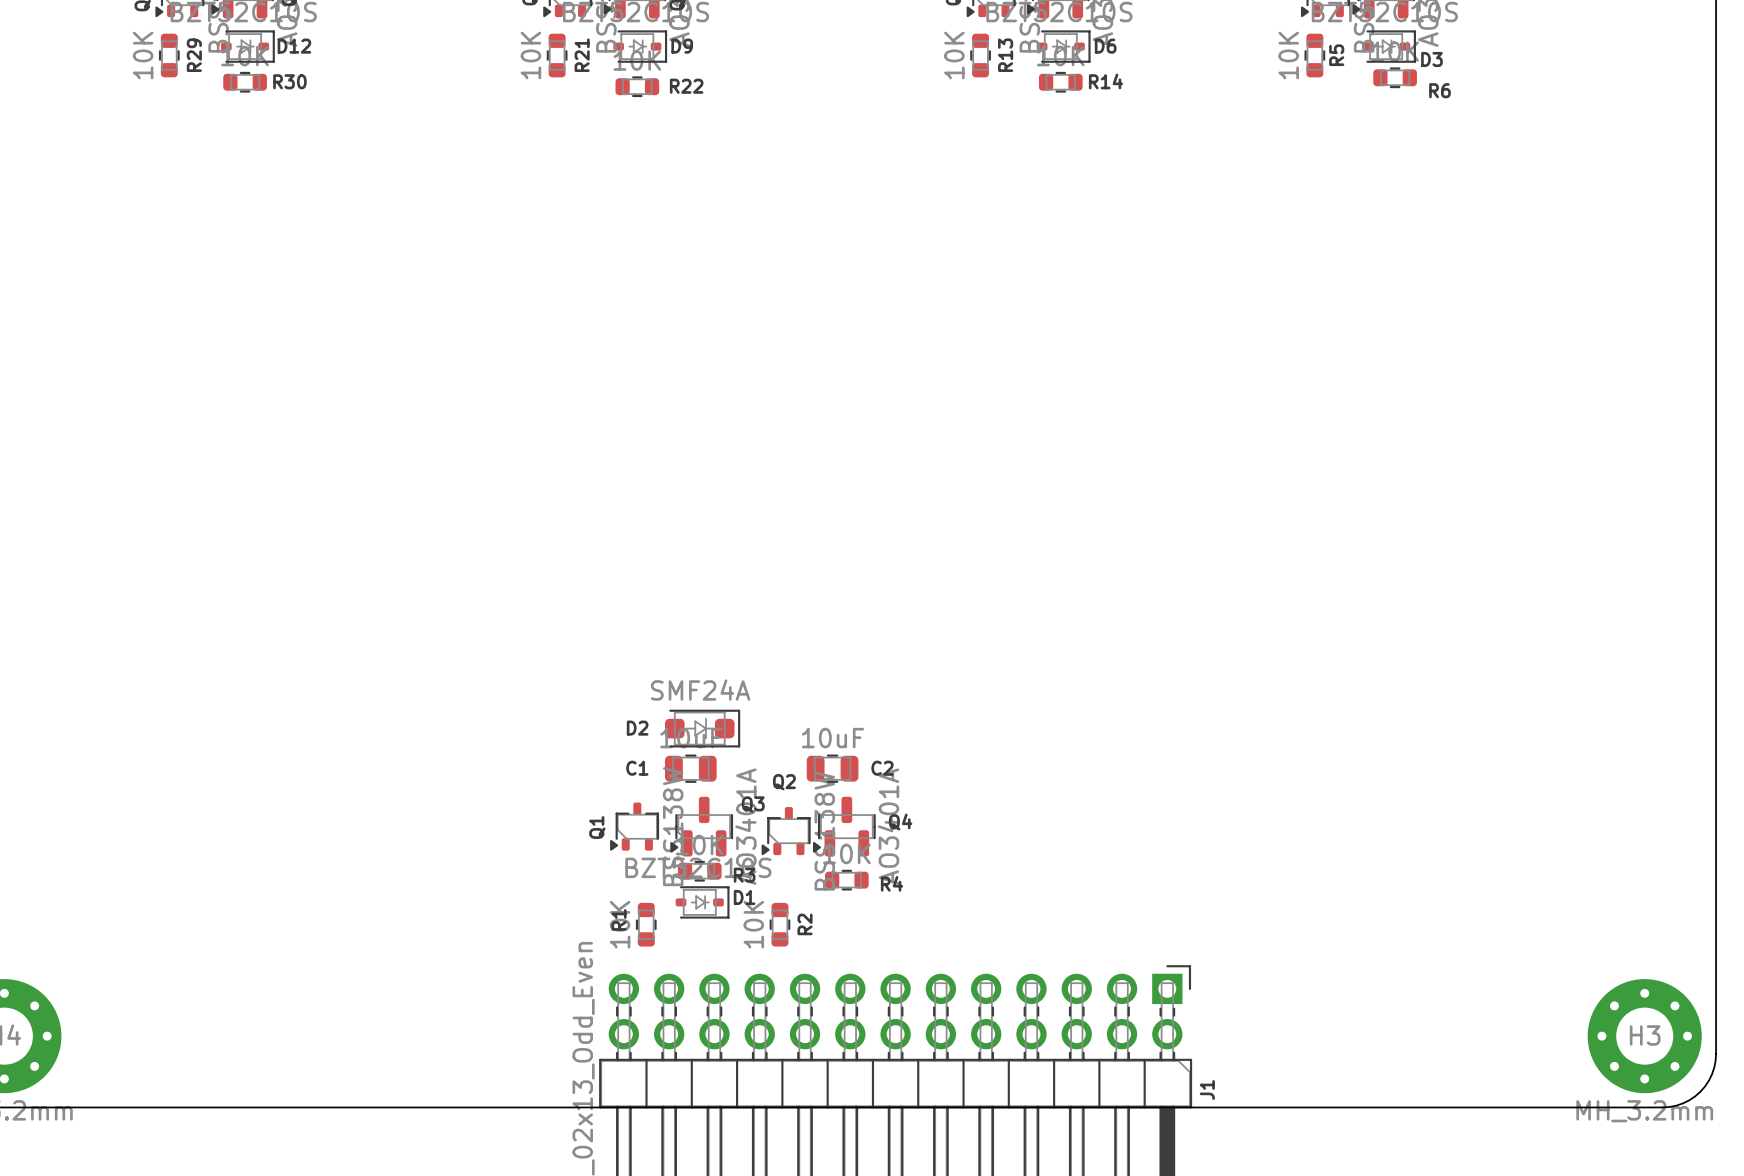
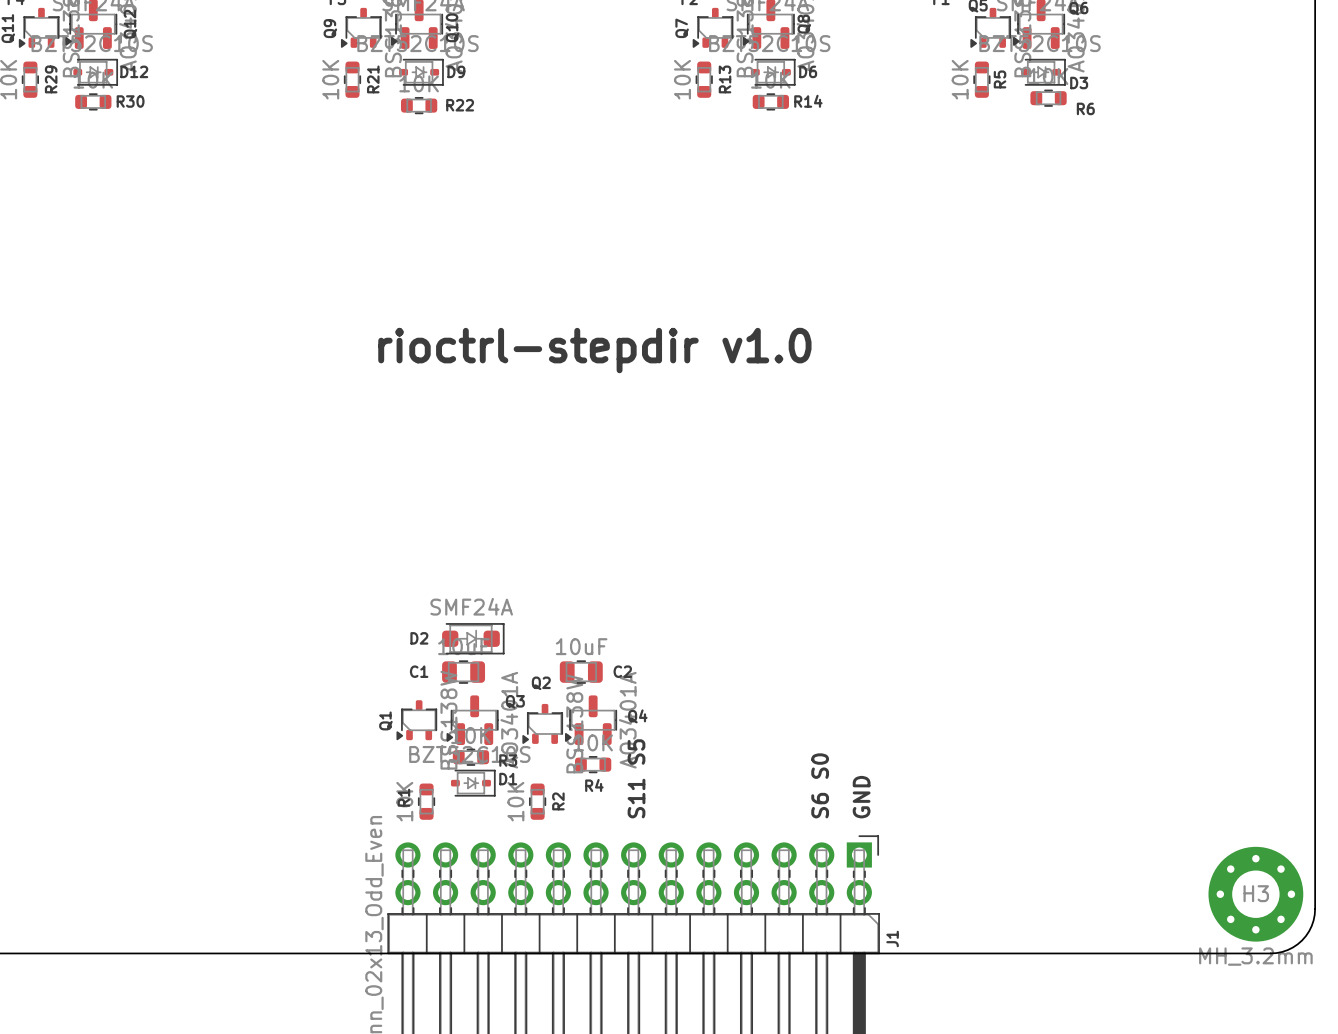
text: none -> rioctrl-stepdir v1.0 (594, 350)
R4 name position: R4 (892, 883) -> R4 (594, 785)
text: none -> S11 S5 (636, 778)
text: none -> S6 S0 (820, 785)
text: none -> GND (861, 797)

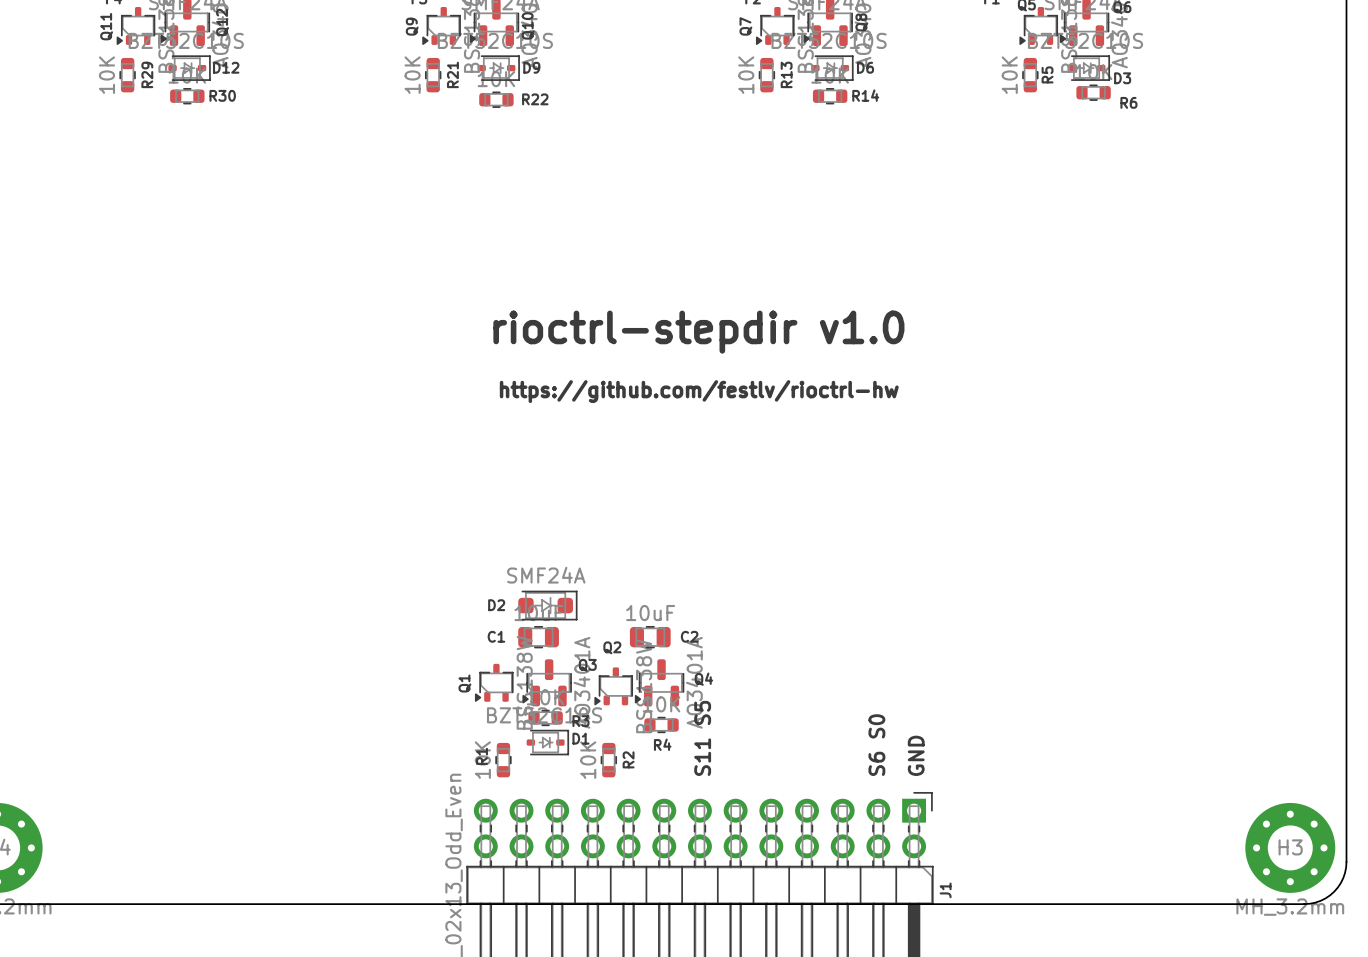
text position: rioctrl-stepdir v1.0 (594, 350) -> rioctrl-stepdir v1.0 (698, 332)
text: none -> https://github.com/festlv/rioctrl-hw (699, 391)

